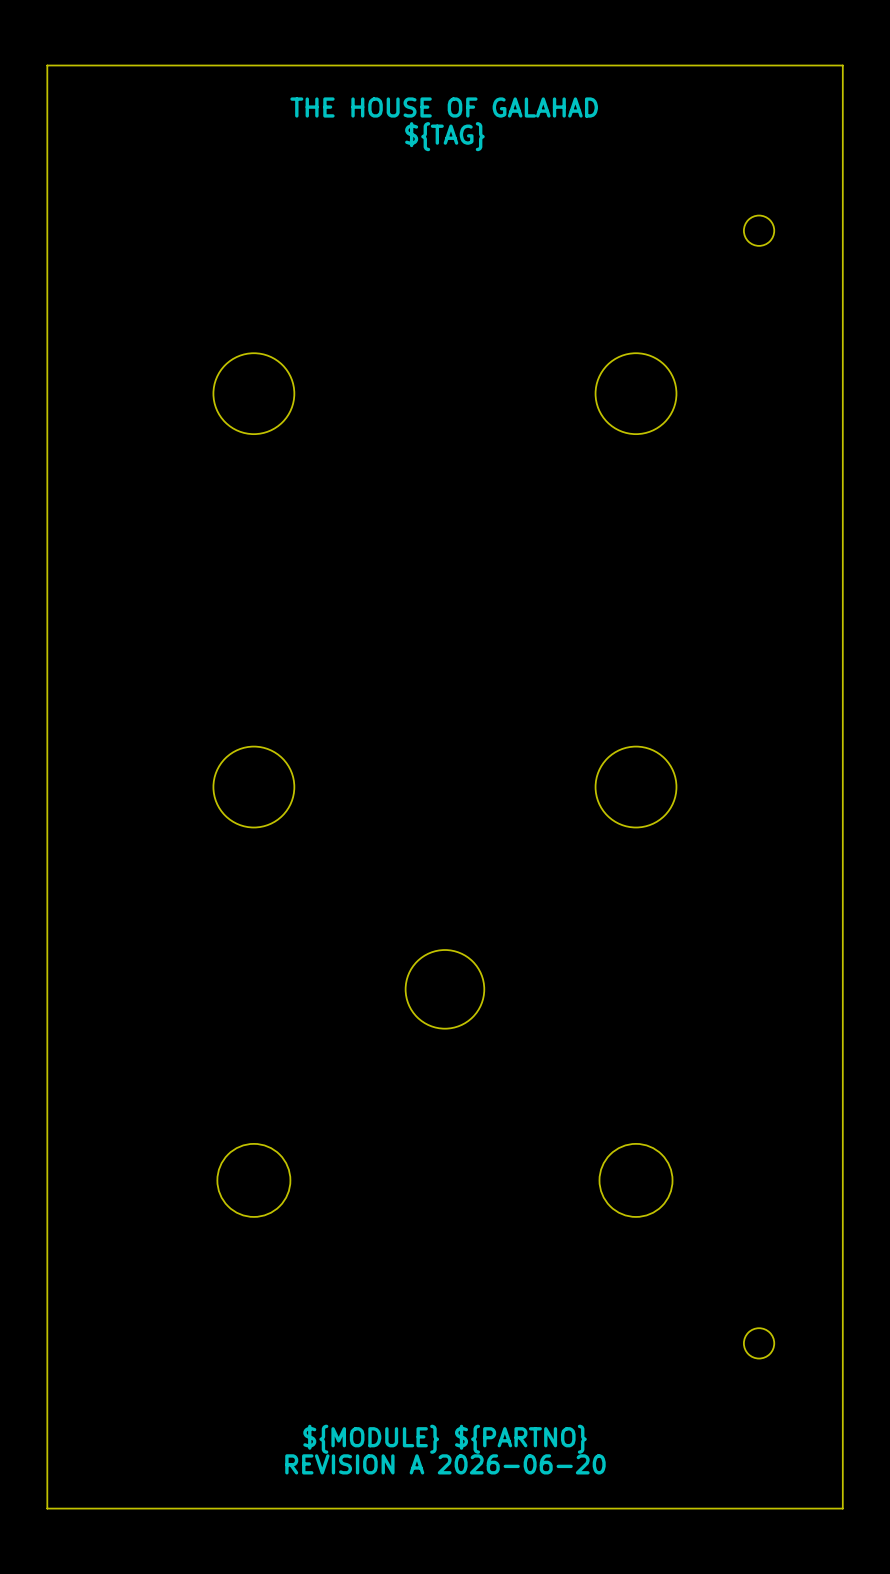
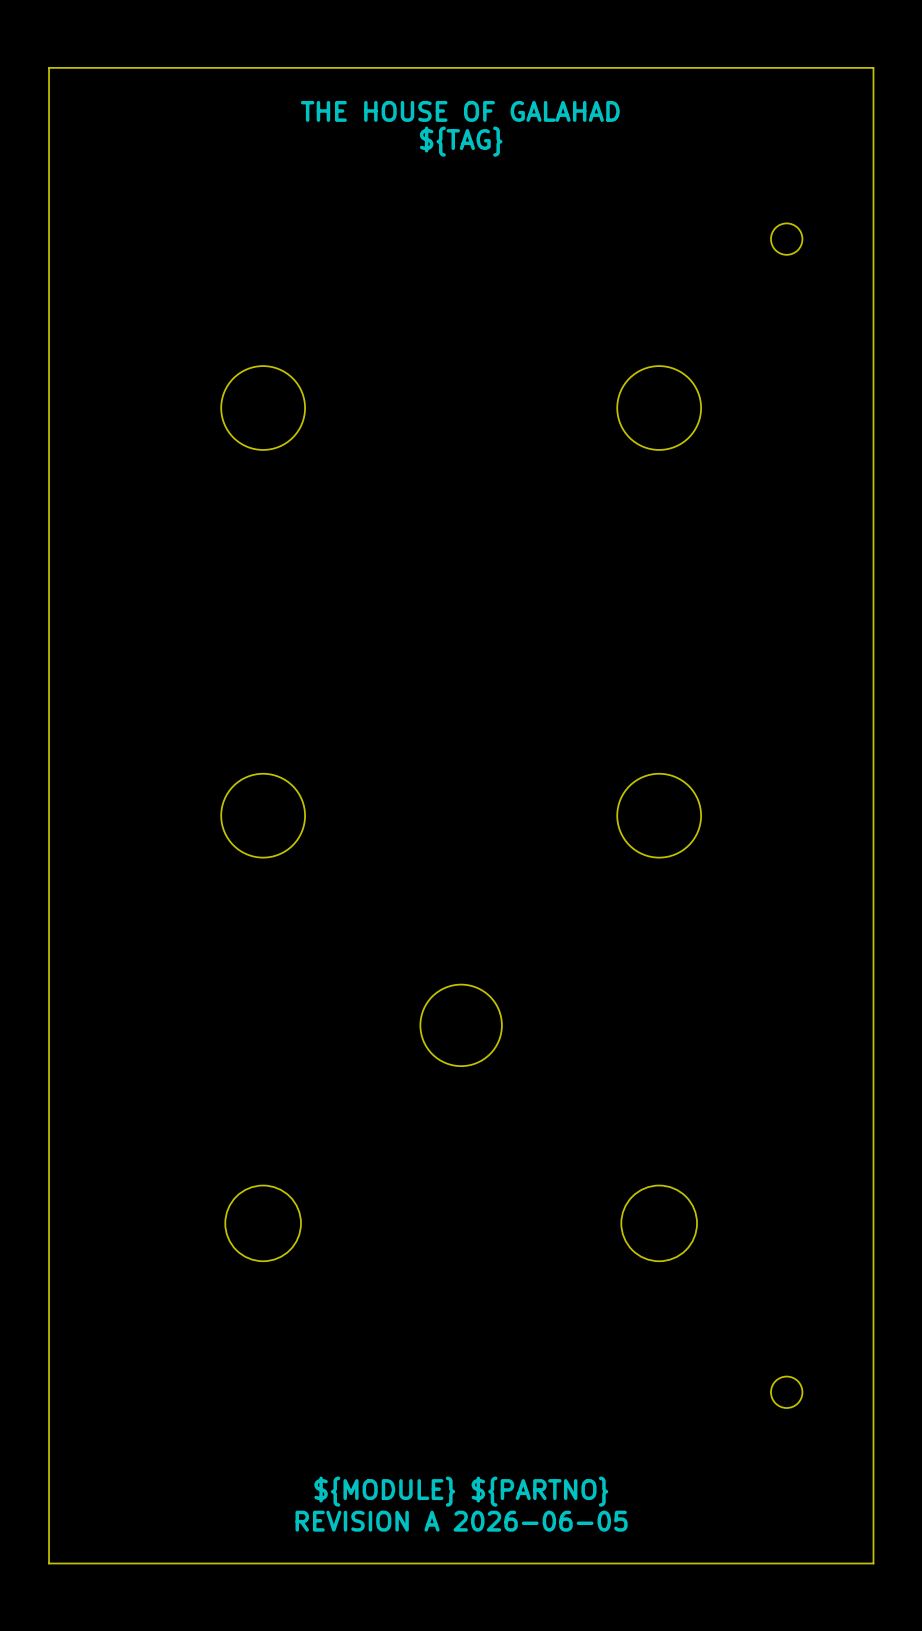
text: REVISION A 2026-06-20 (445, 1464) -> REVISION A 2026-06-05 (461, 1521)

